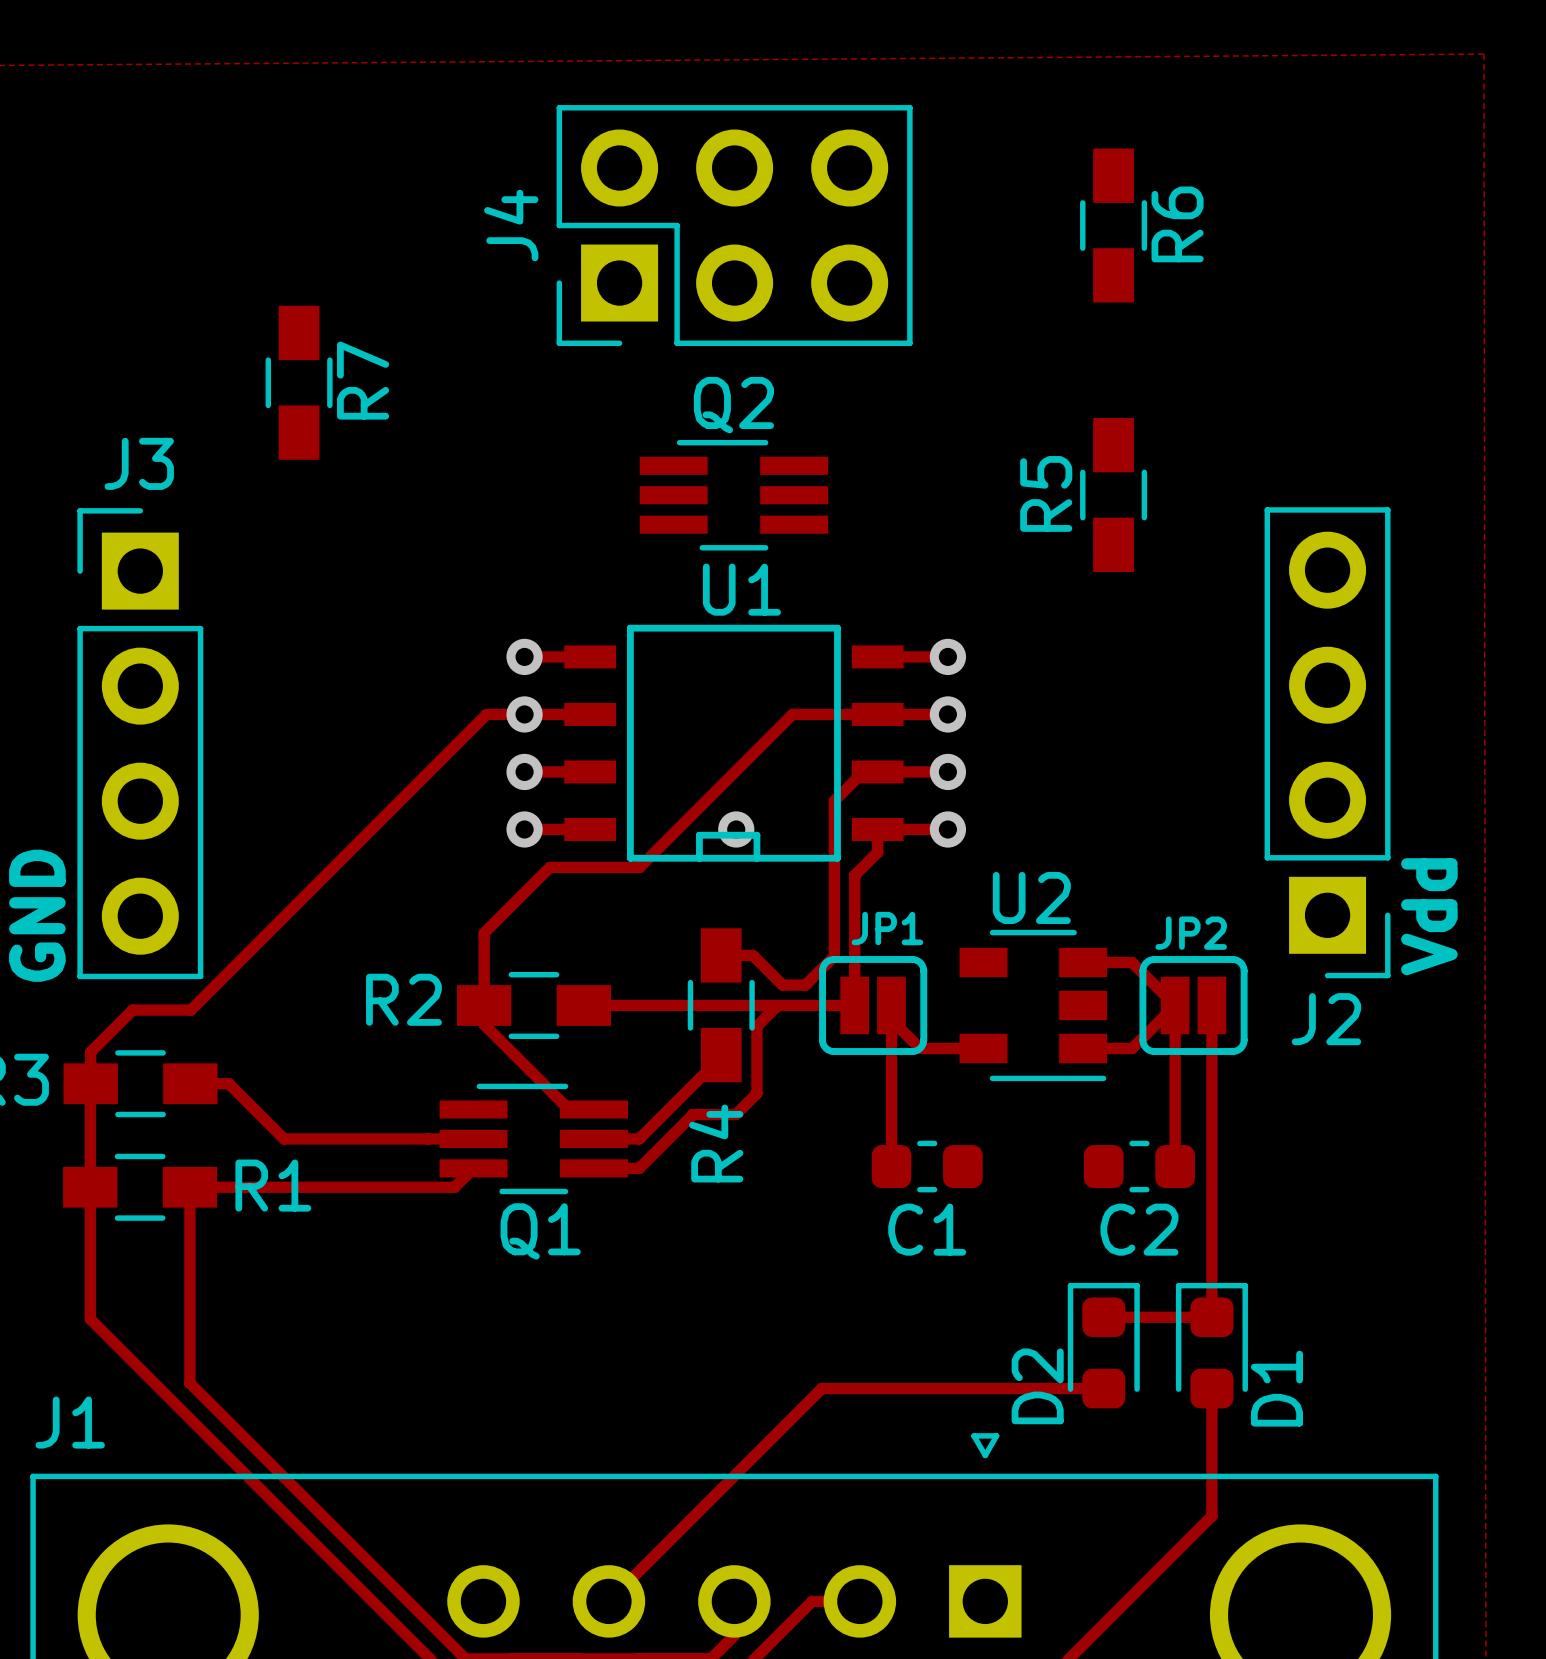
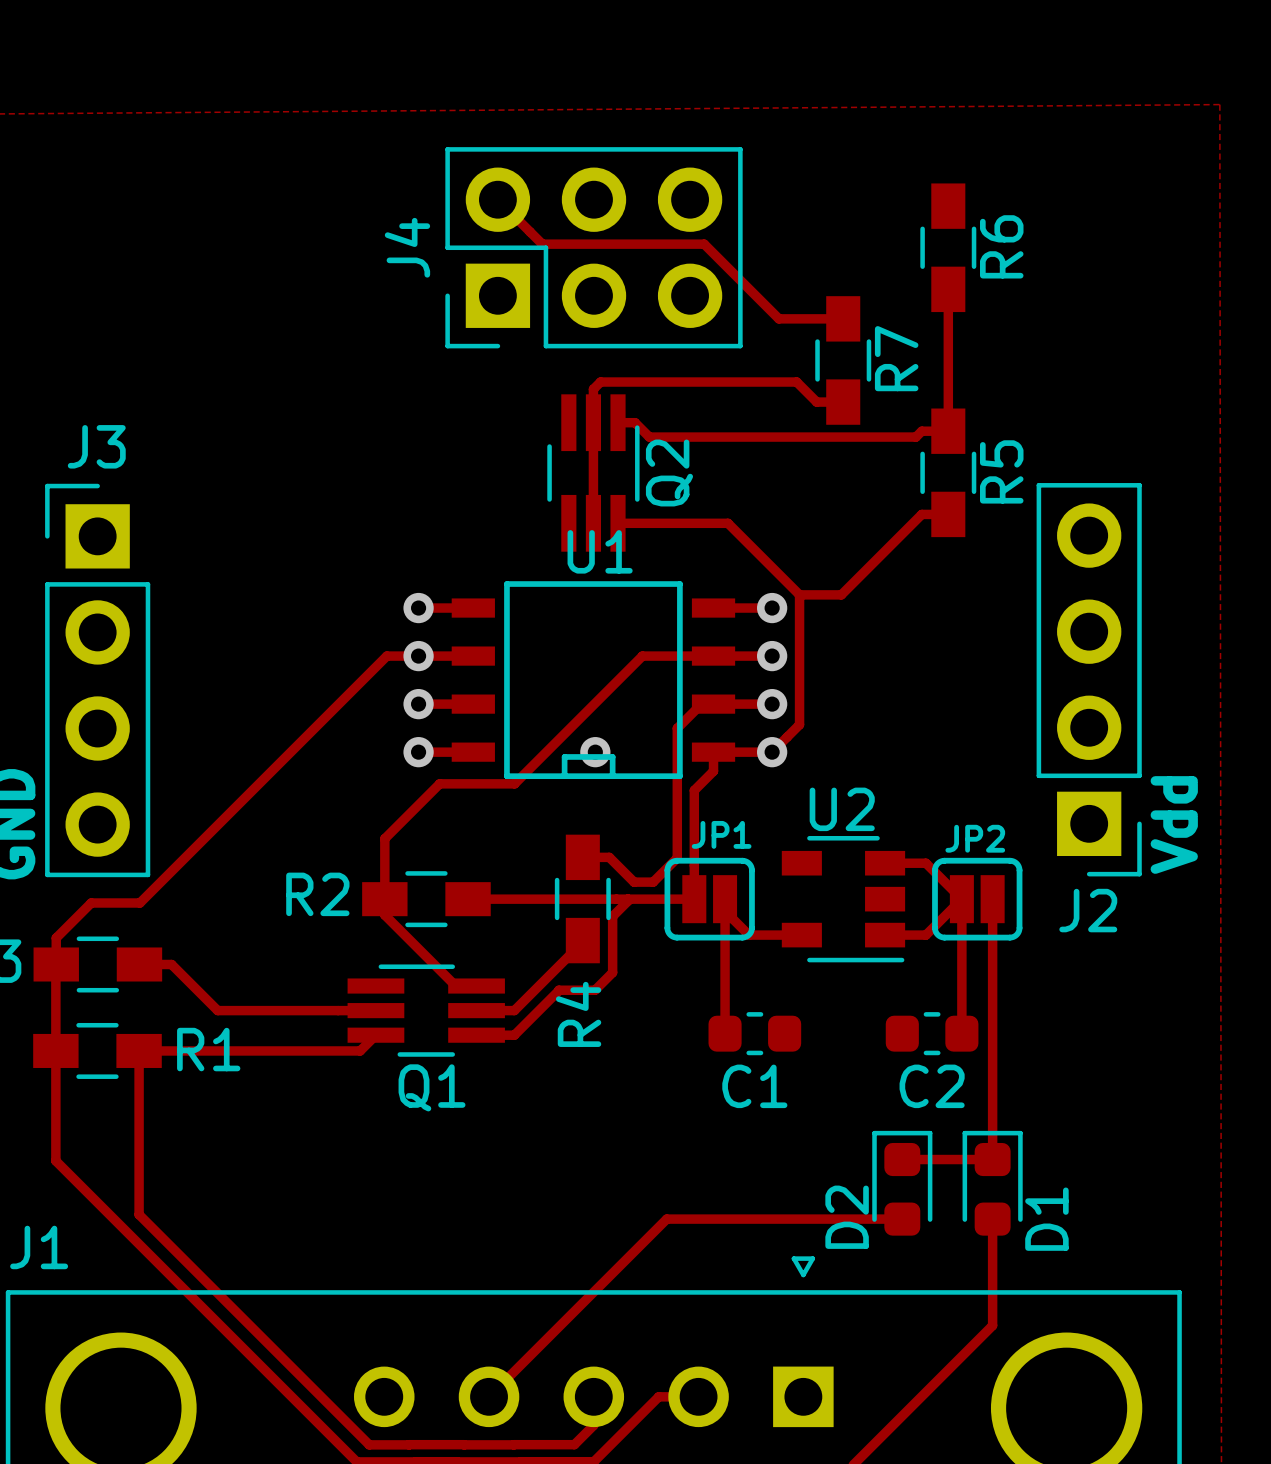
track: none -> (497, 199) (542, 244) (704, 244) (778, 318) (843, 318)
R6 position: (1113, 225) -> (948, 247)
track: none -> (948, 289) (948, 431) (921, 431) (915, 437) (649, 437) (635, 422) (618, 422)
R7 position: (299, 382) -> (843, 360)
track: none -> (843, 402) (816, 402) (796, 382) (600, 382) (593, 389) (593, 523)
R5 name position: R5 (1046, 493) -> R5 (1001, 471)
Q2 rotation: 0° (733, 495) -> 90° clockwise (593, 473)
R5 position: (1113, 495) -> (948, 472)
track: none -> (948, 514) (921, 514) (841, 594) (799, 594)
track: none -> (618, 523) (727, 523) (799, 594)
track: none -> (799, 594) (799, 724) (772, 752)

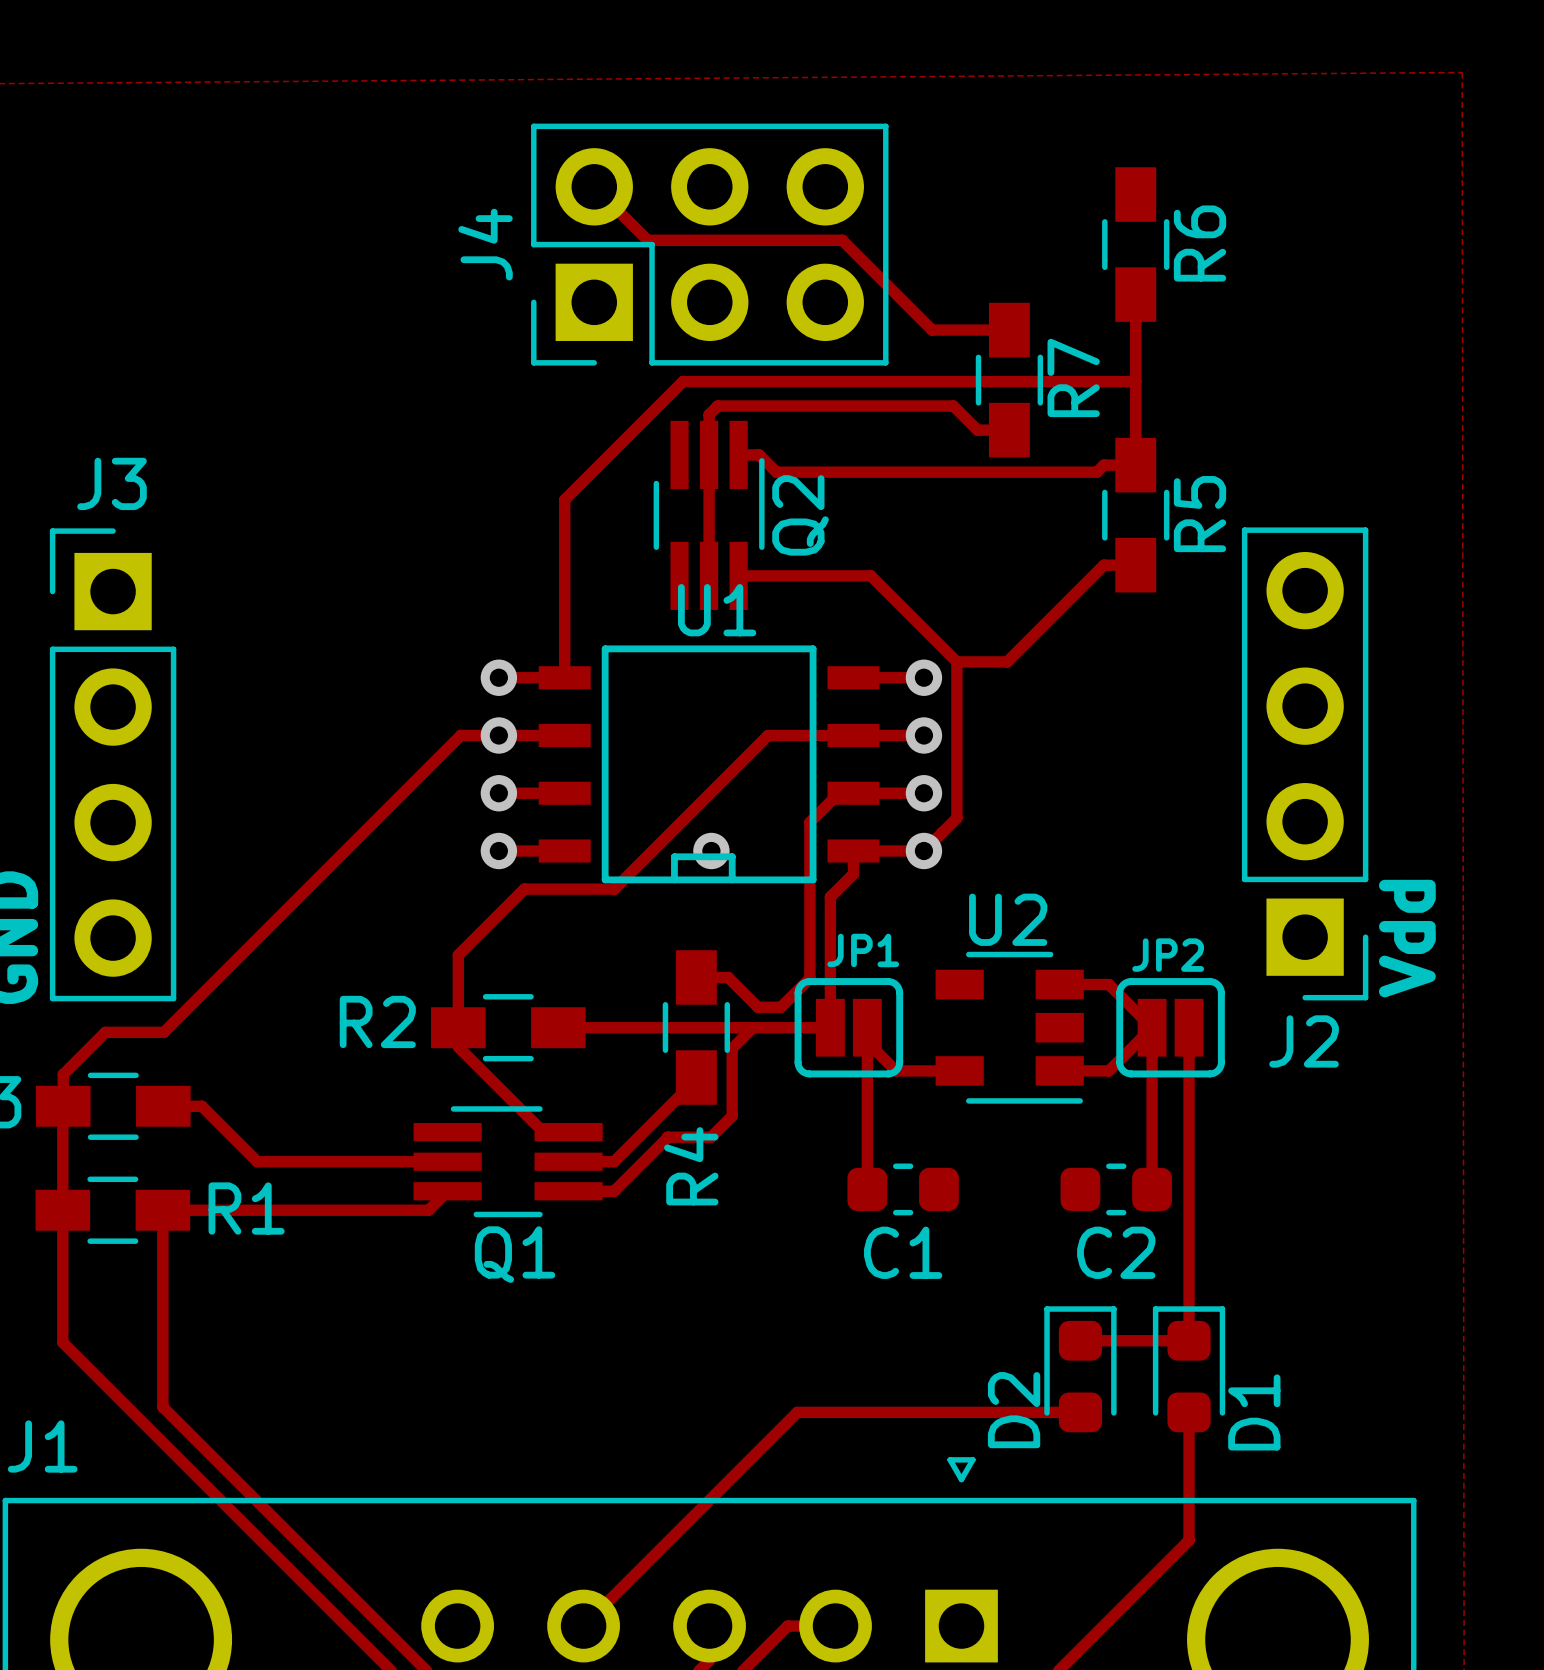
track: none -> (1135, 381) (683, 381) (564, 499) (564, 677)

